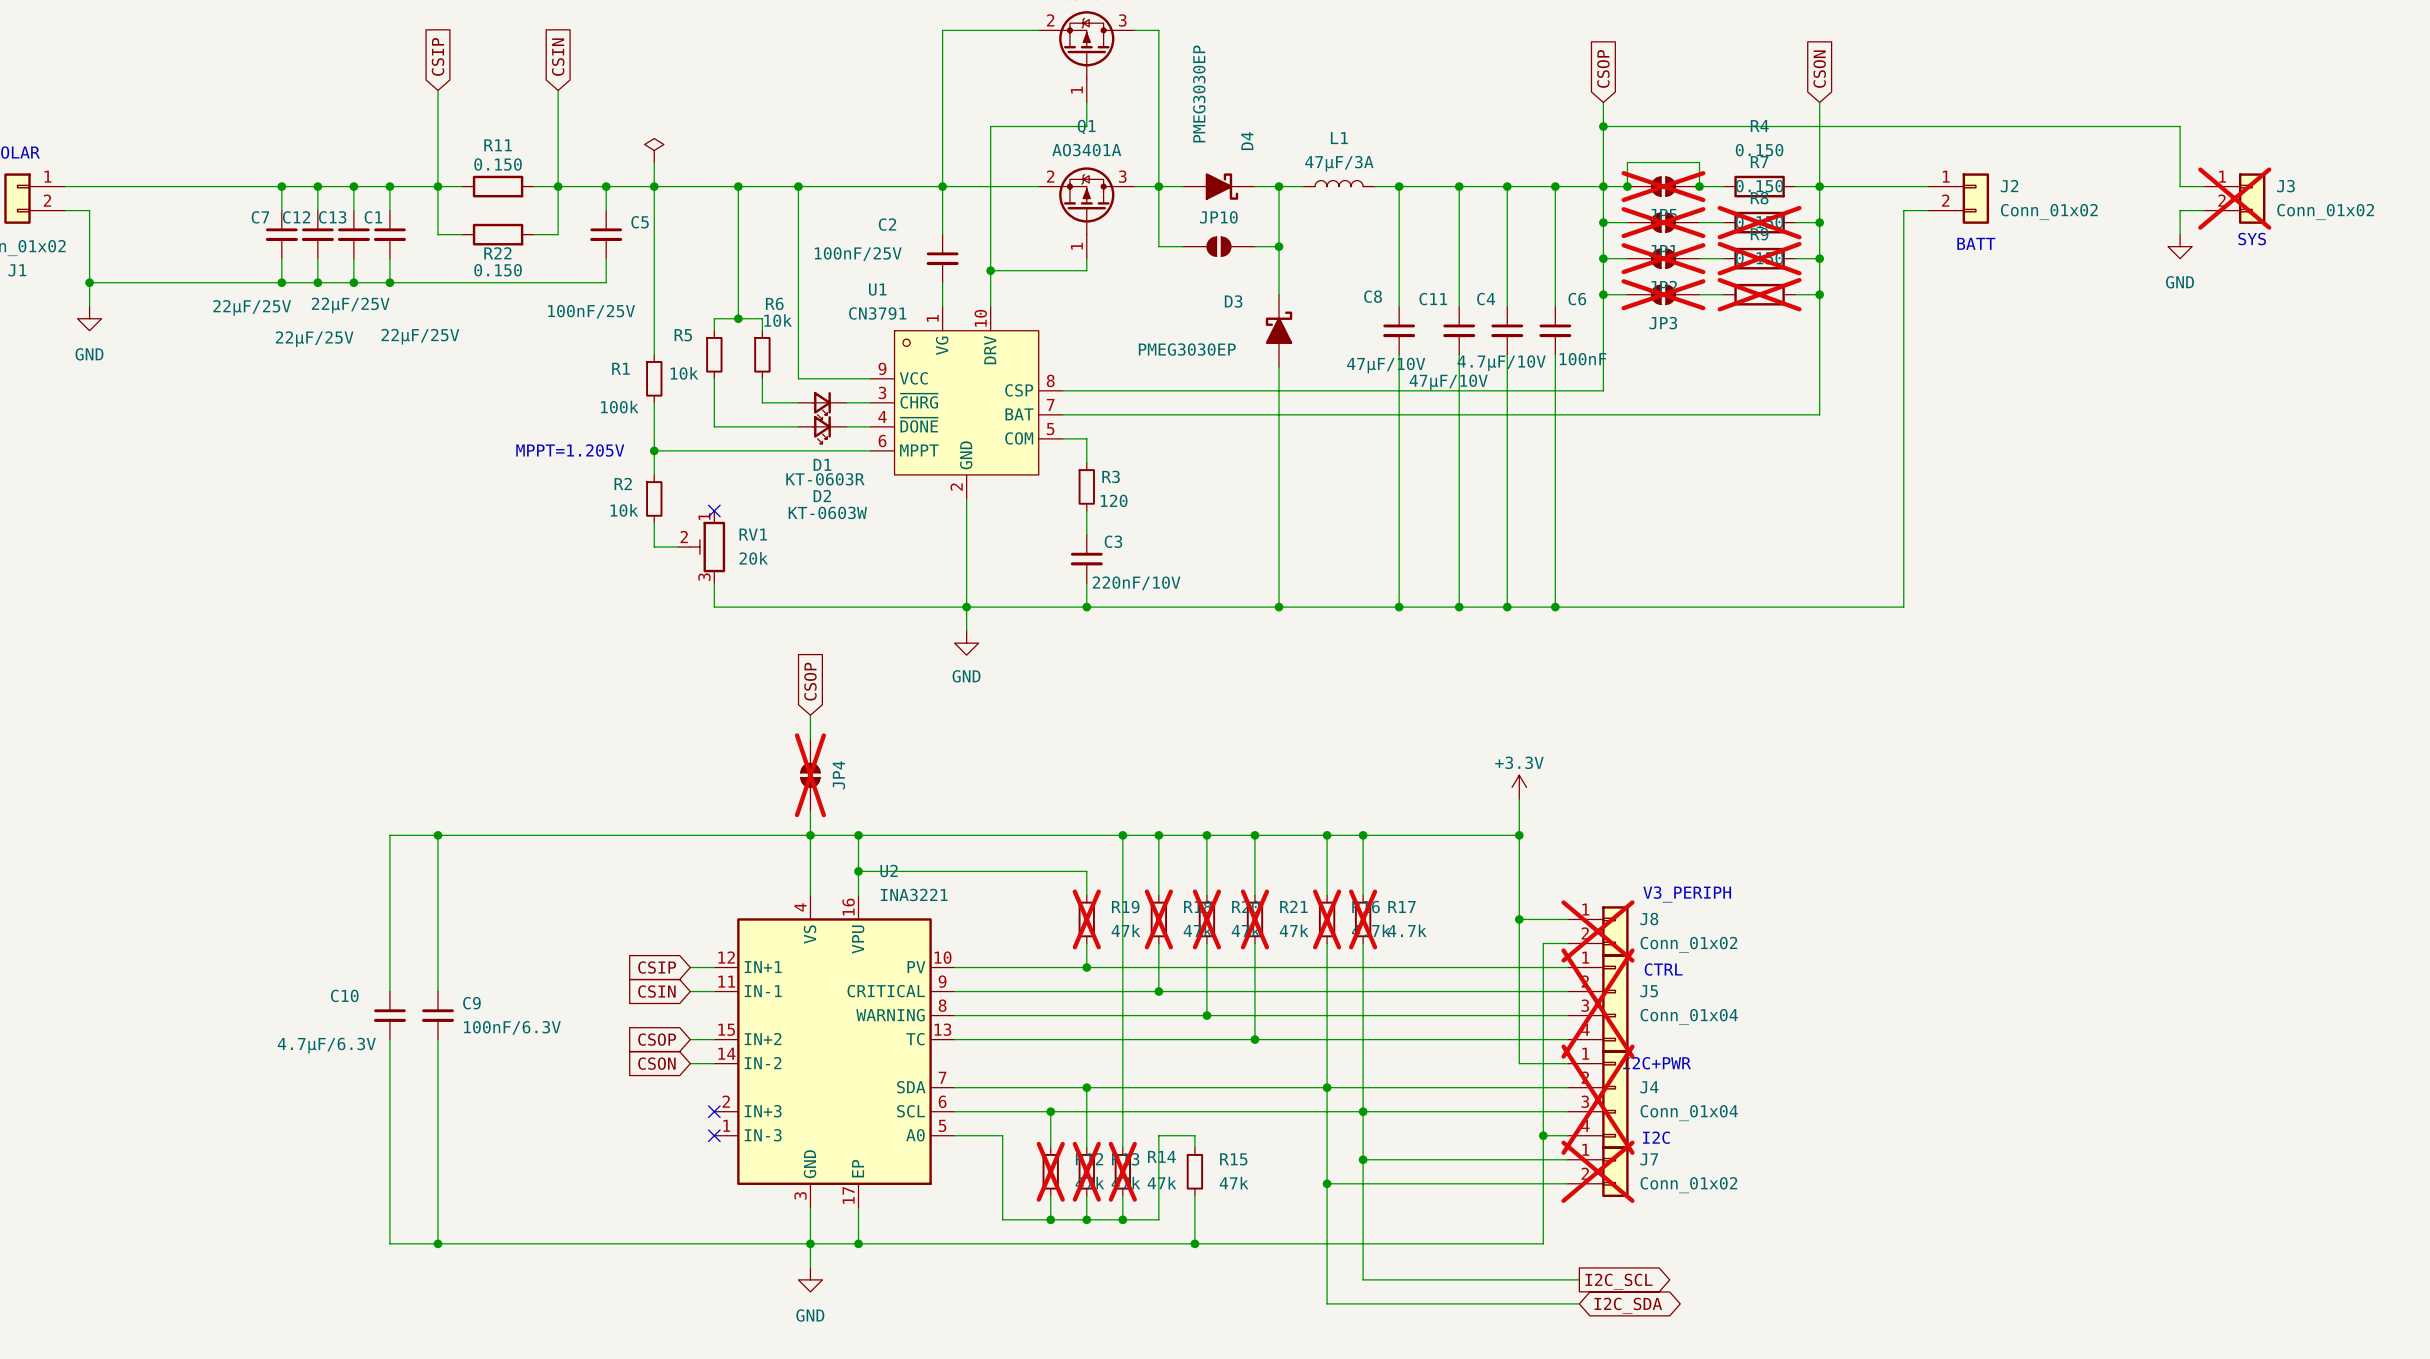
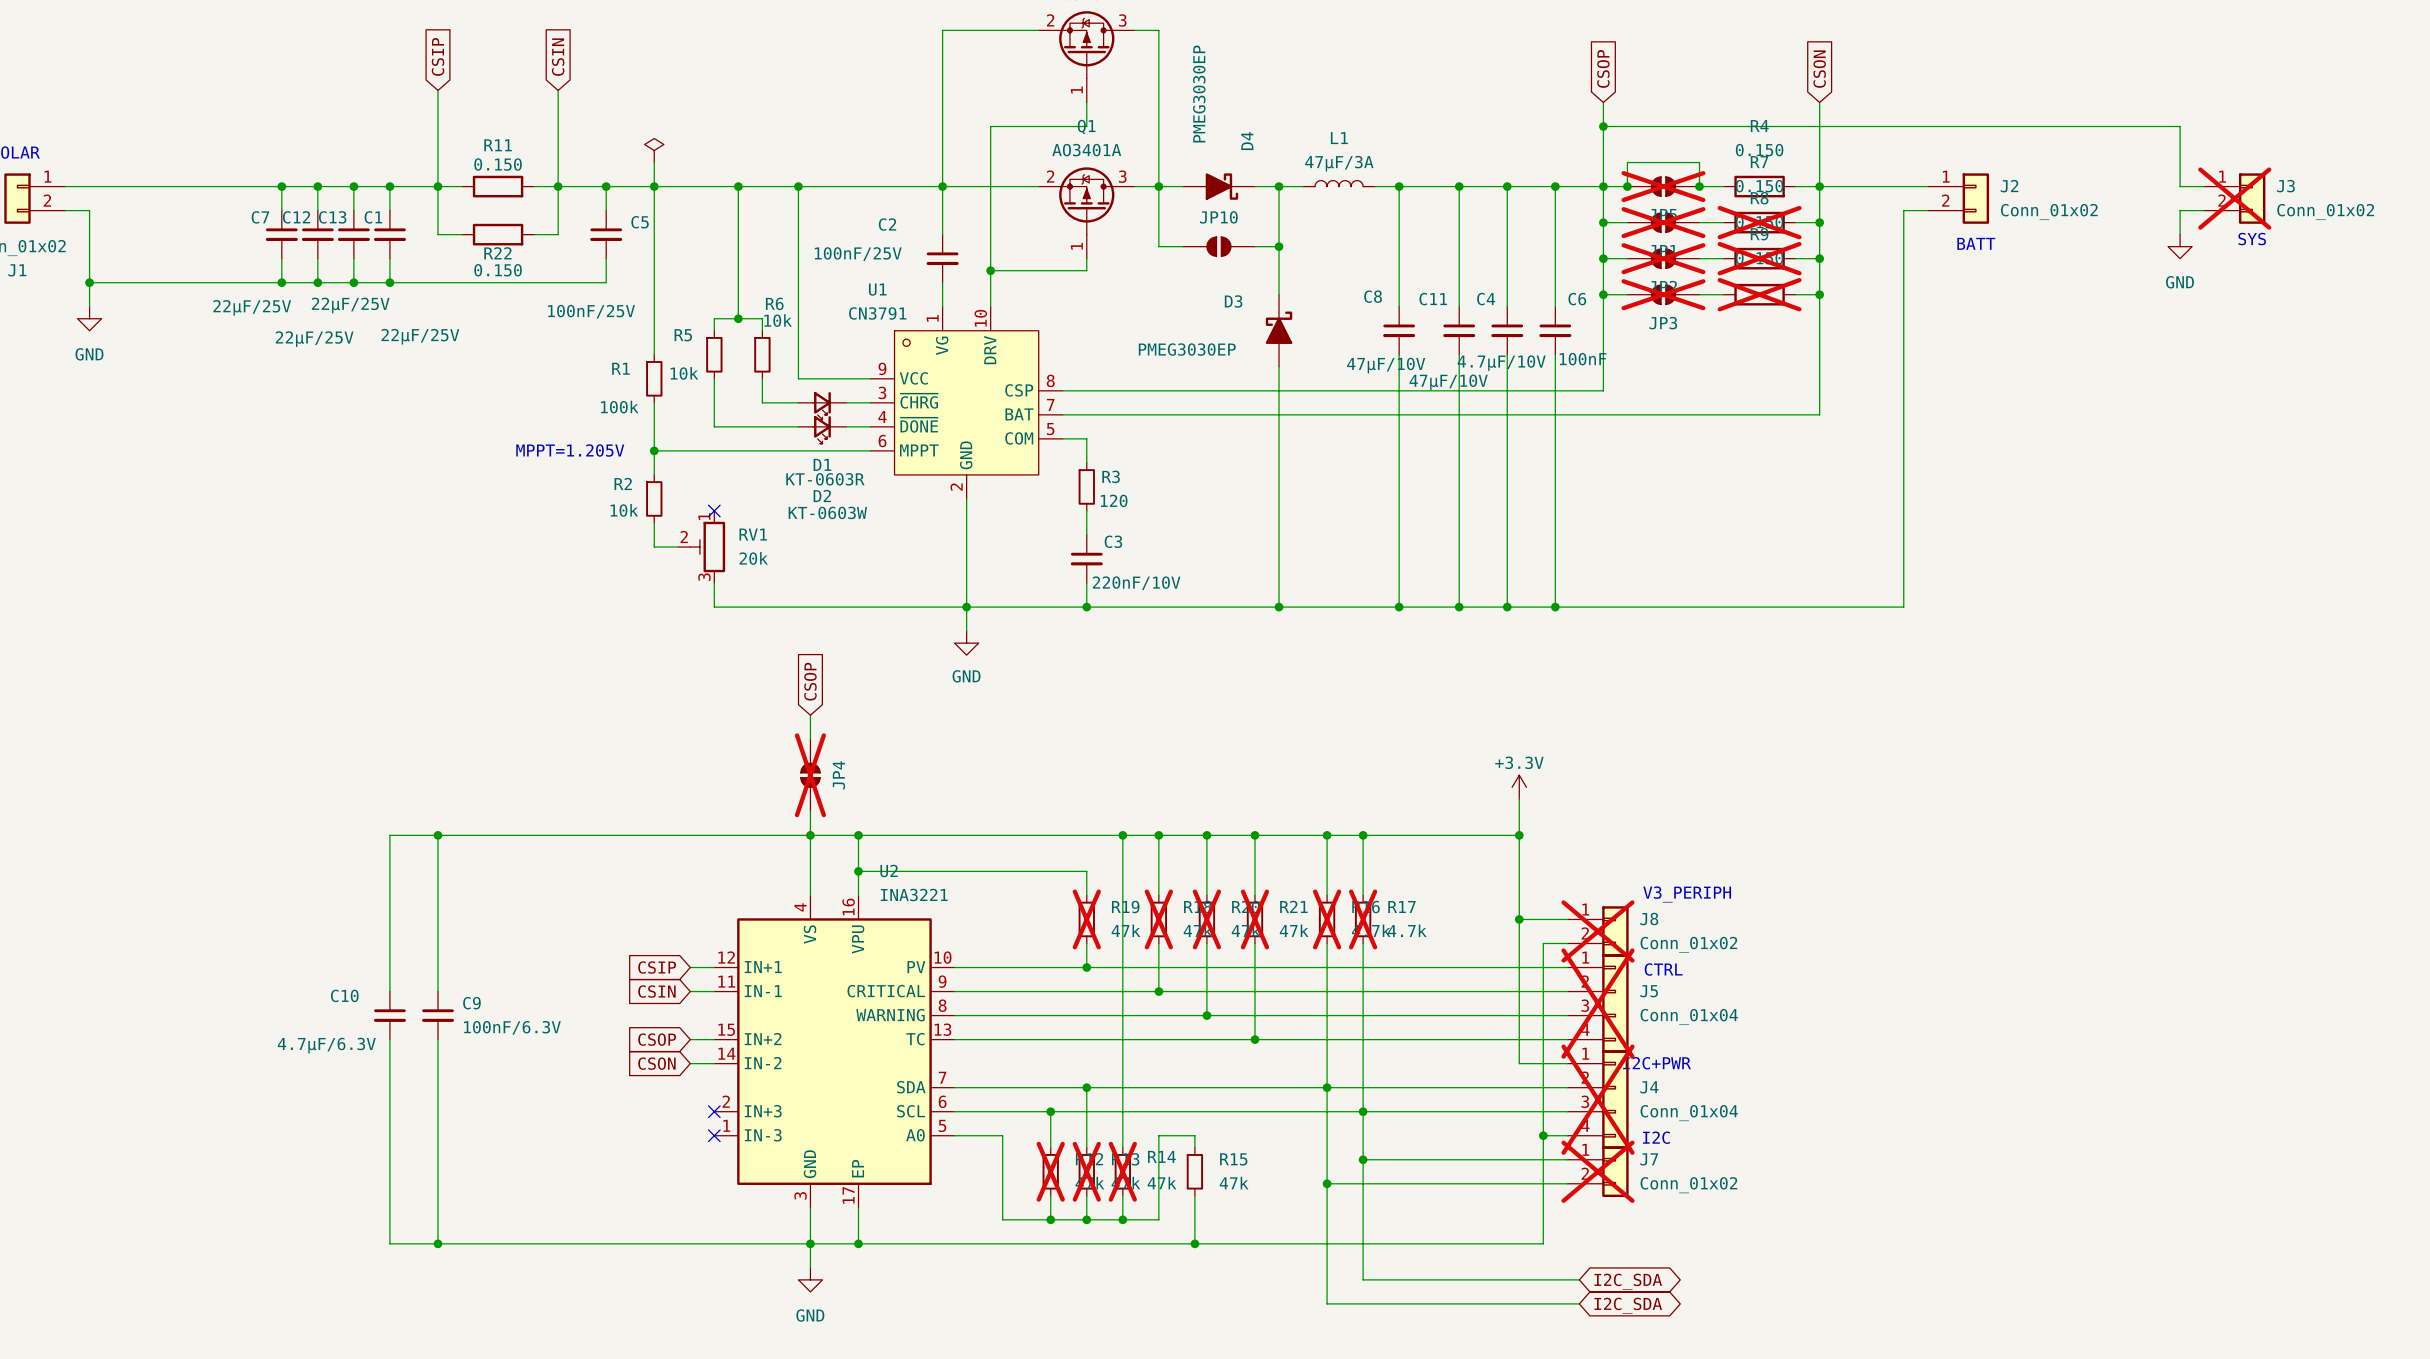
global label shape: output (1619, 1281) -> bidirectional (1628, 1281)
global label: I2C_SCL (1619, 1281) -> I2C_SDA (1628, 1281)

